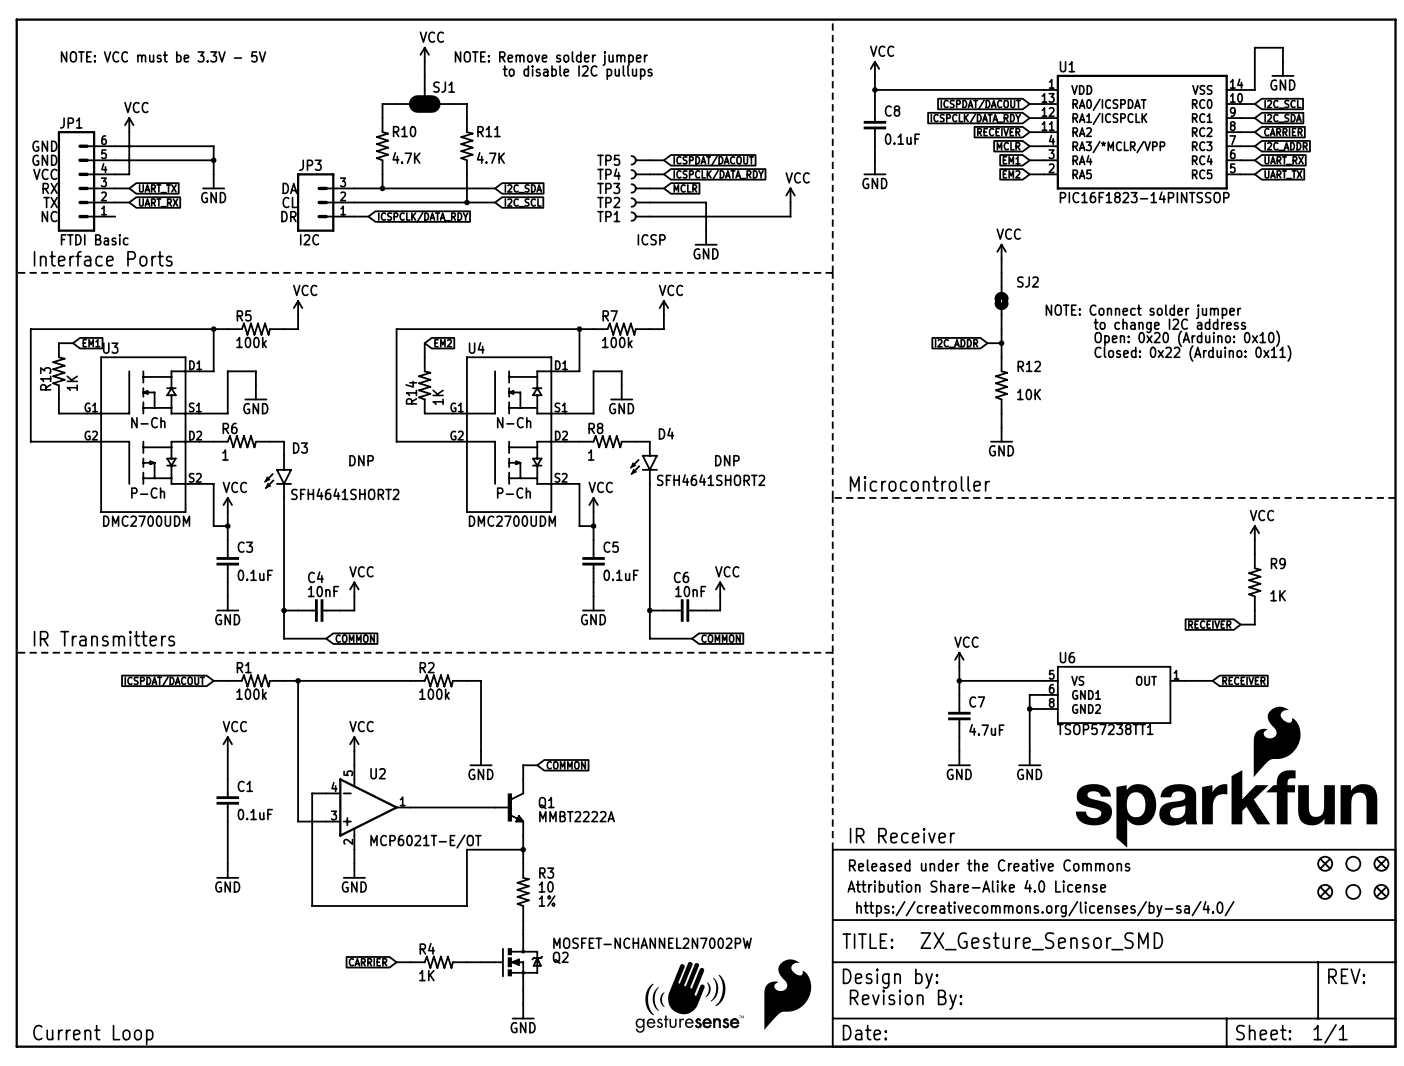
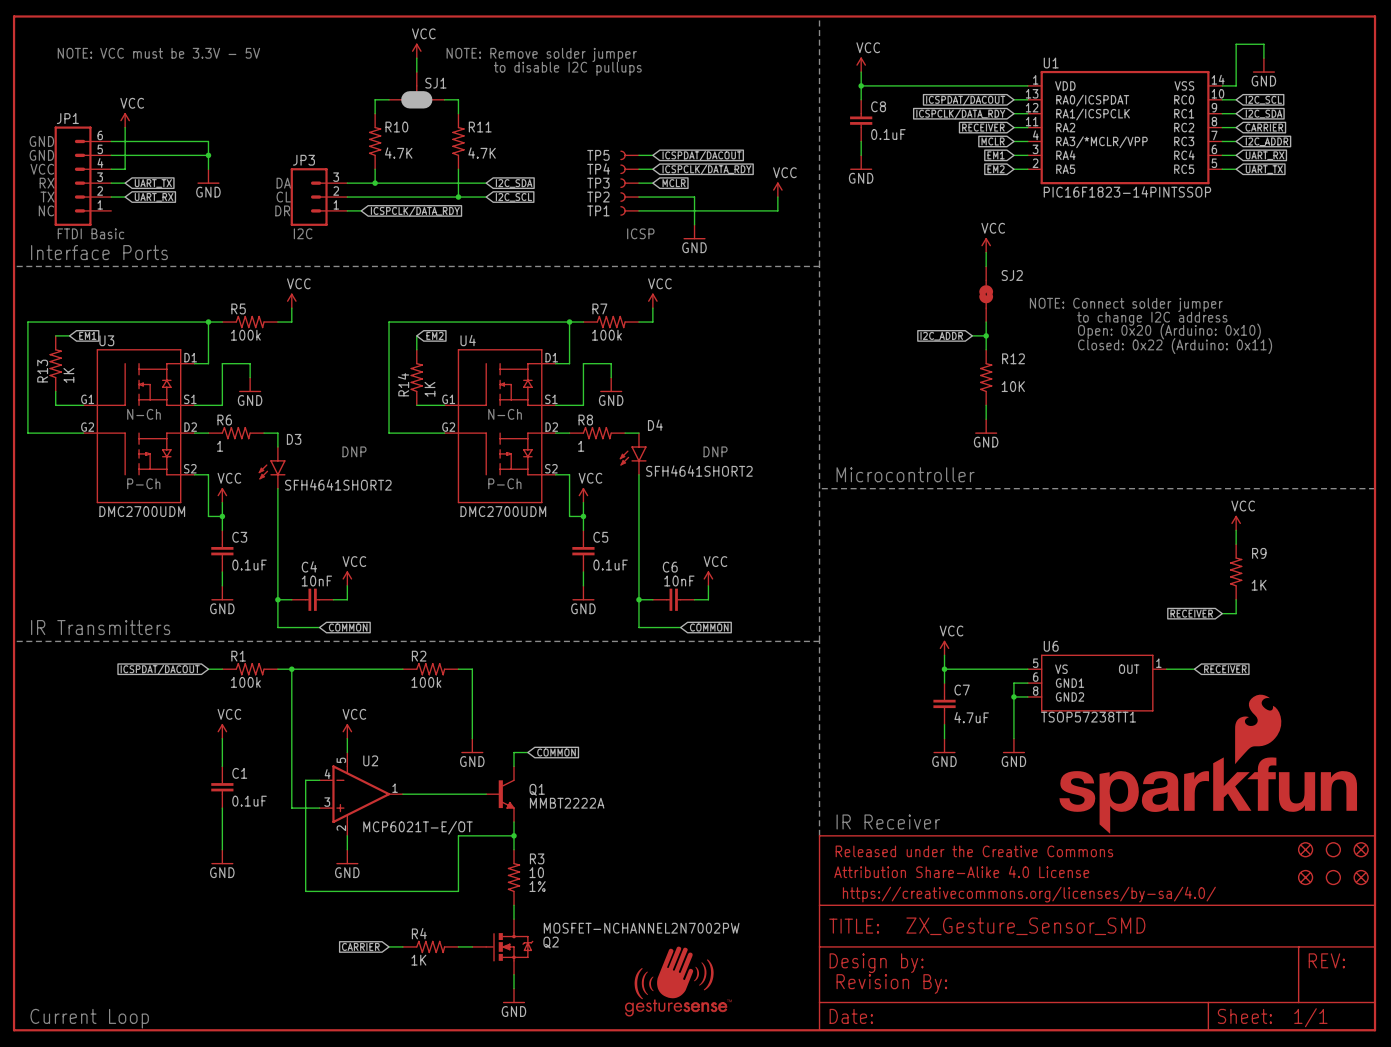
part: (787, 994) -> none

